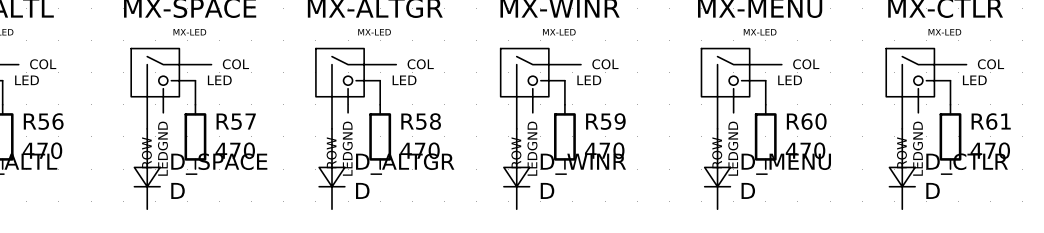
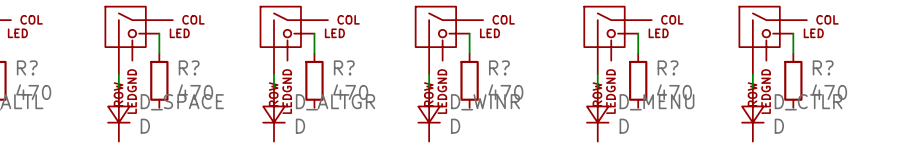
R56 name: R56 (43, 121) -> R? (27, 67)
R57 name: R57 (236, 121) -> R? (189, 67)
R58 name: R58 (421, 121) -> R? (344, 67)
R59 name: R59 (605, 121) -> R? (499, 67)
R60 name: R60 (806, 121) -> R? (668, 67)
R61 name: R61 (991, 121) -> R? (823, 67)

